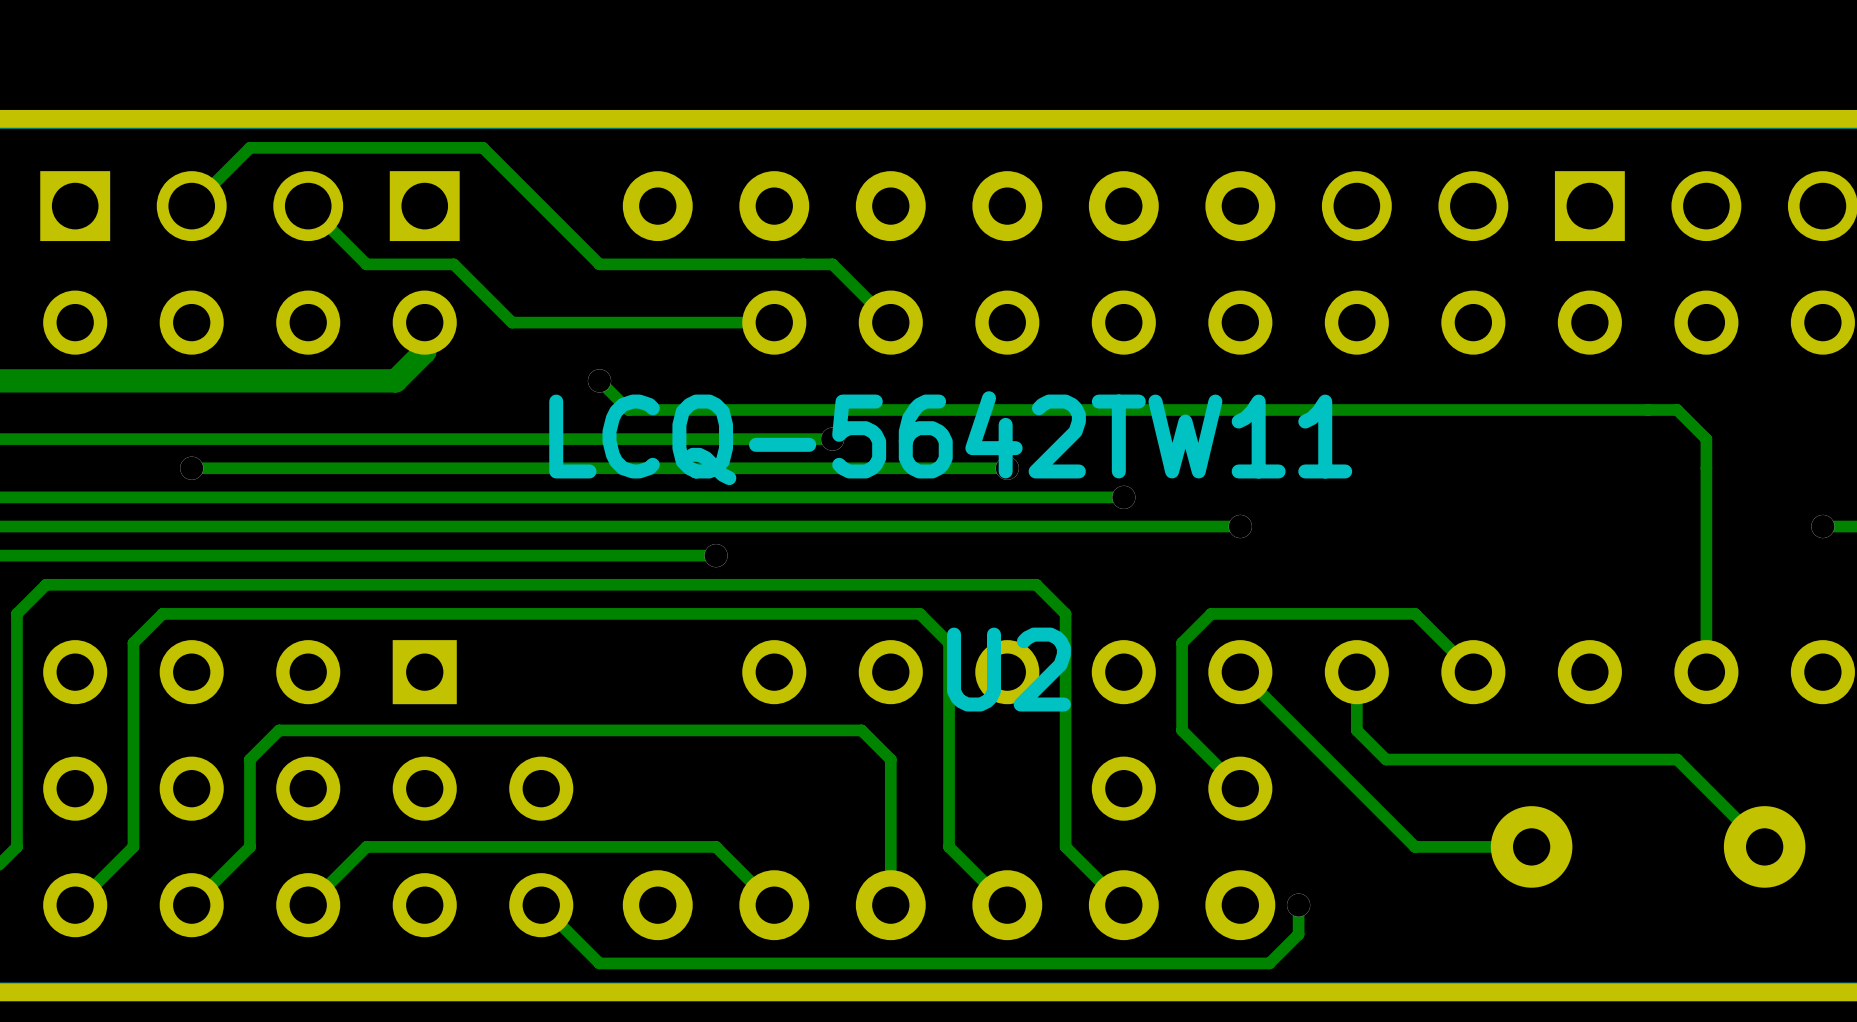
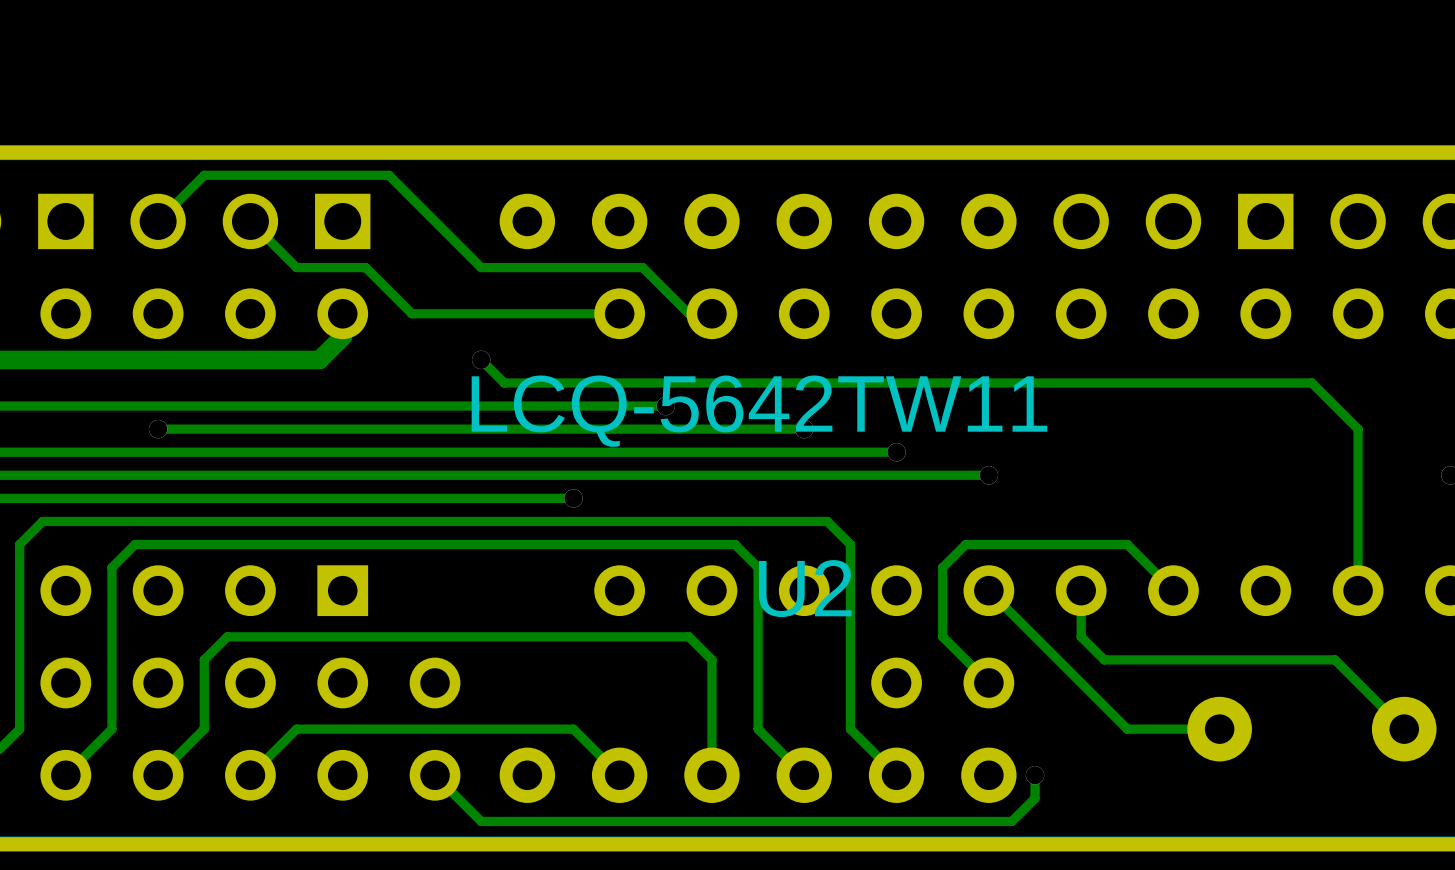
track: (803, 264) (832, 264) (890, 322) -> (642, 267) (688, 313) (711, 313)
track: (1648, 409) (1677, 409) (1706, 439) (1706, 468) -> (1311, 382) (1358, 429)

